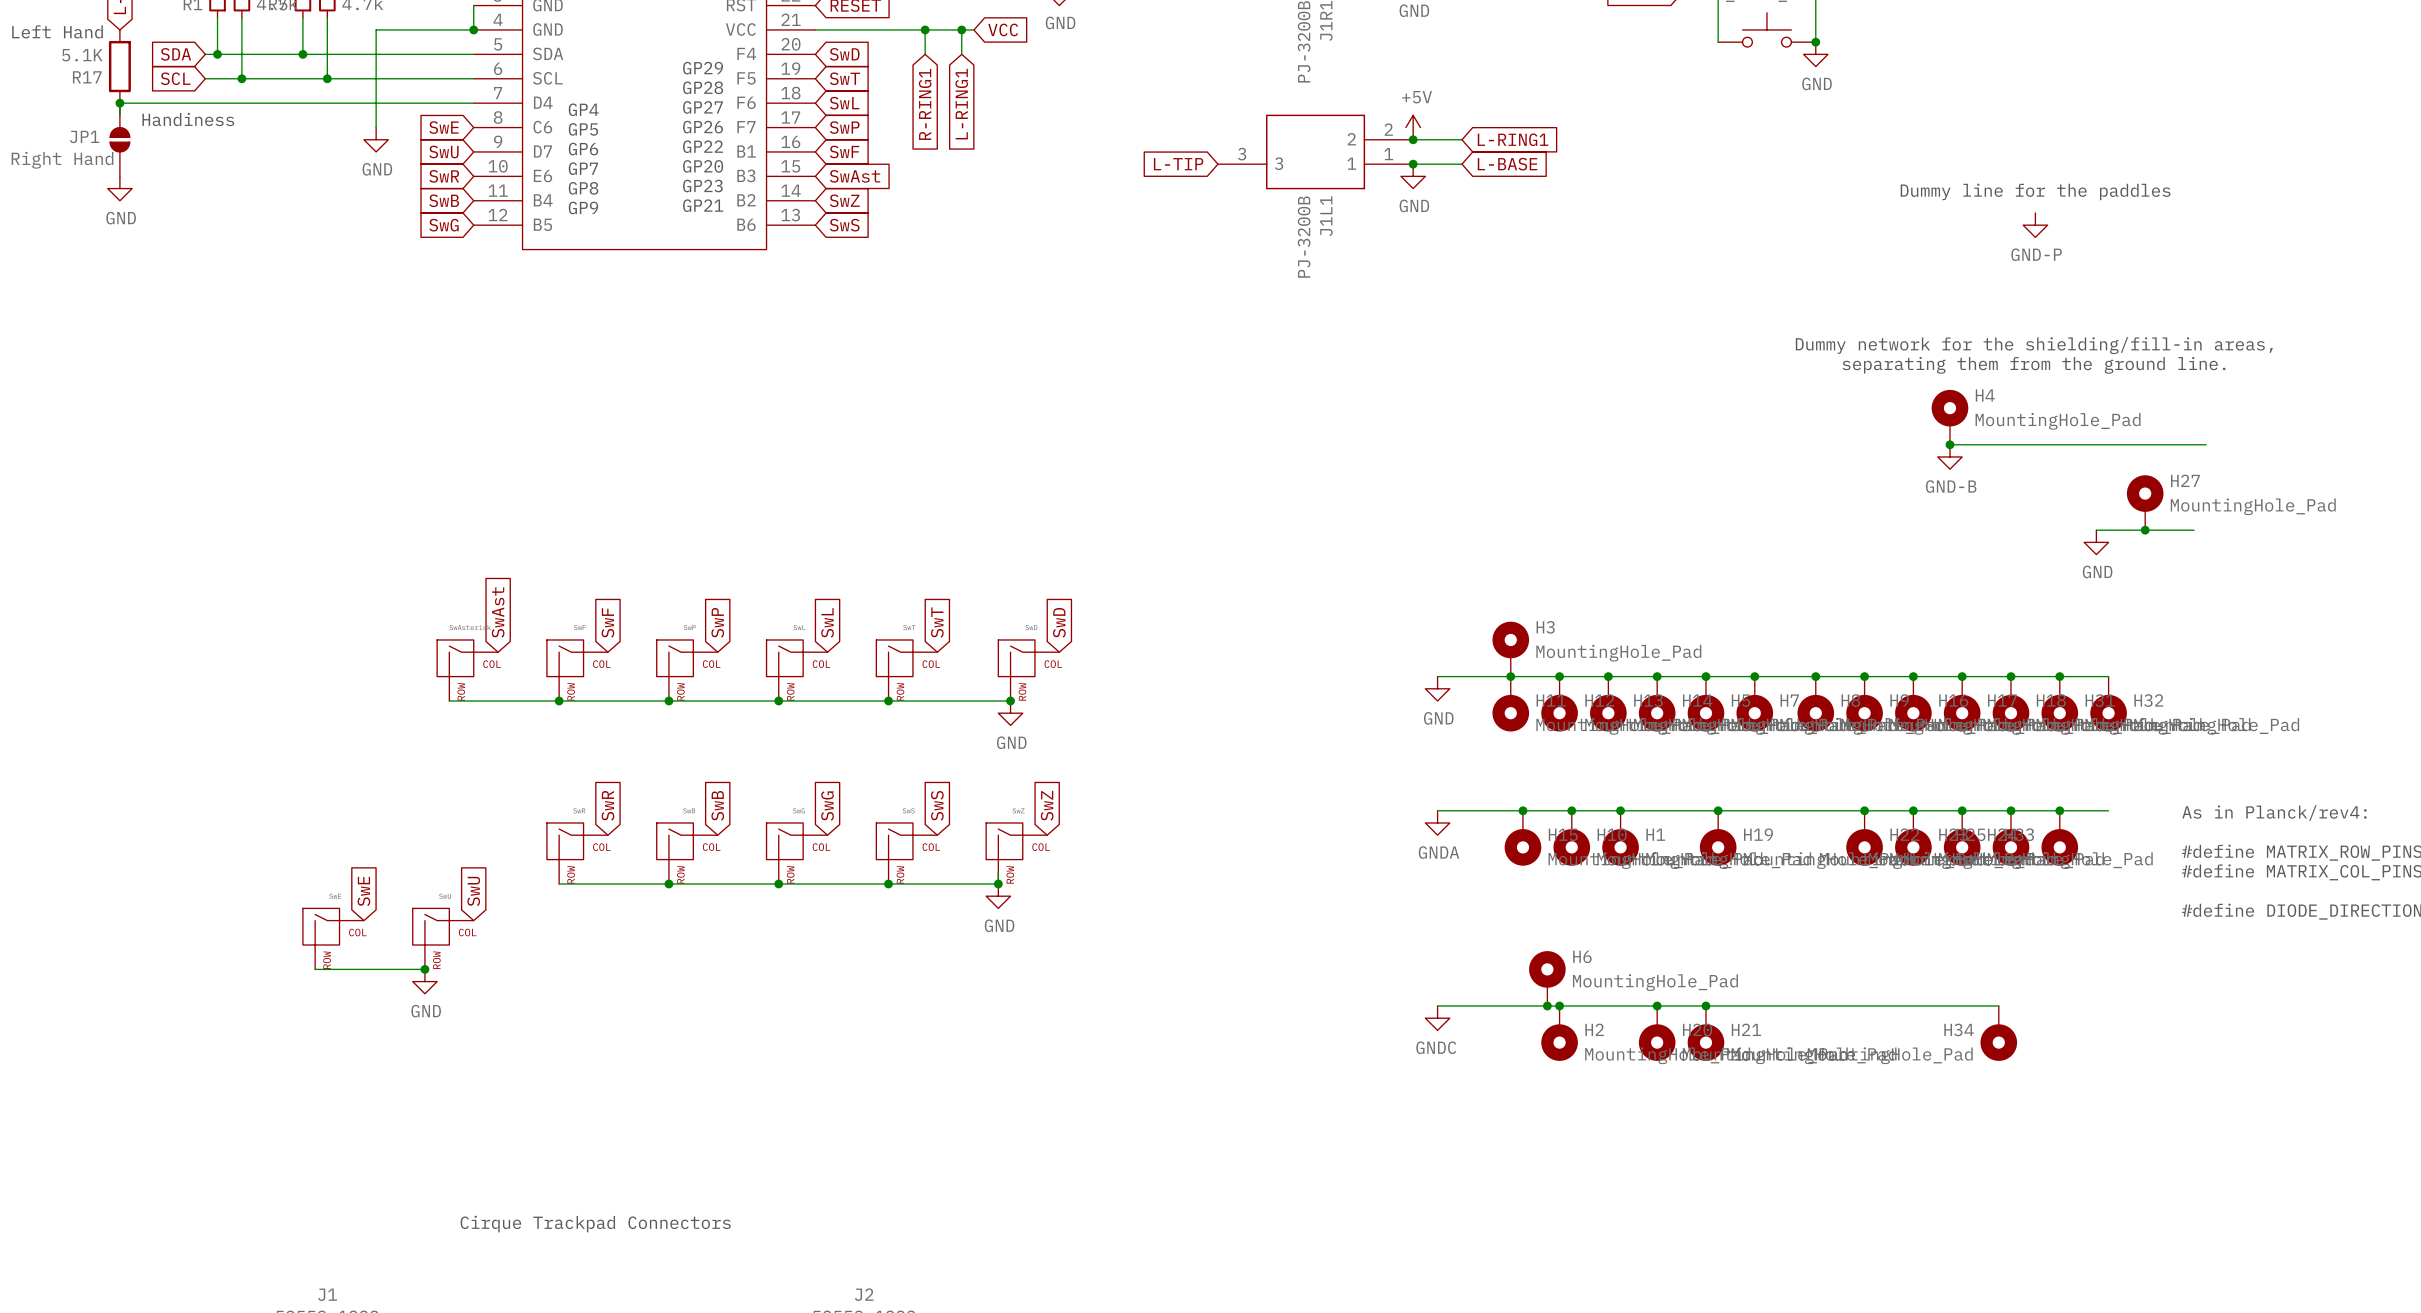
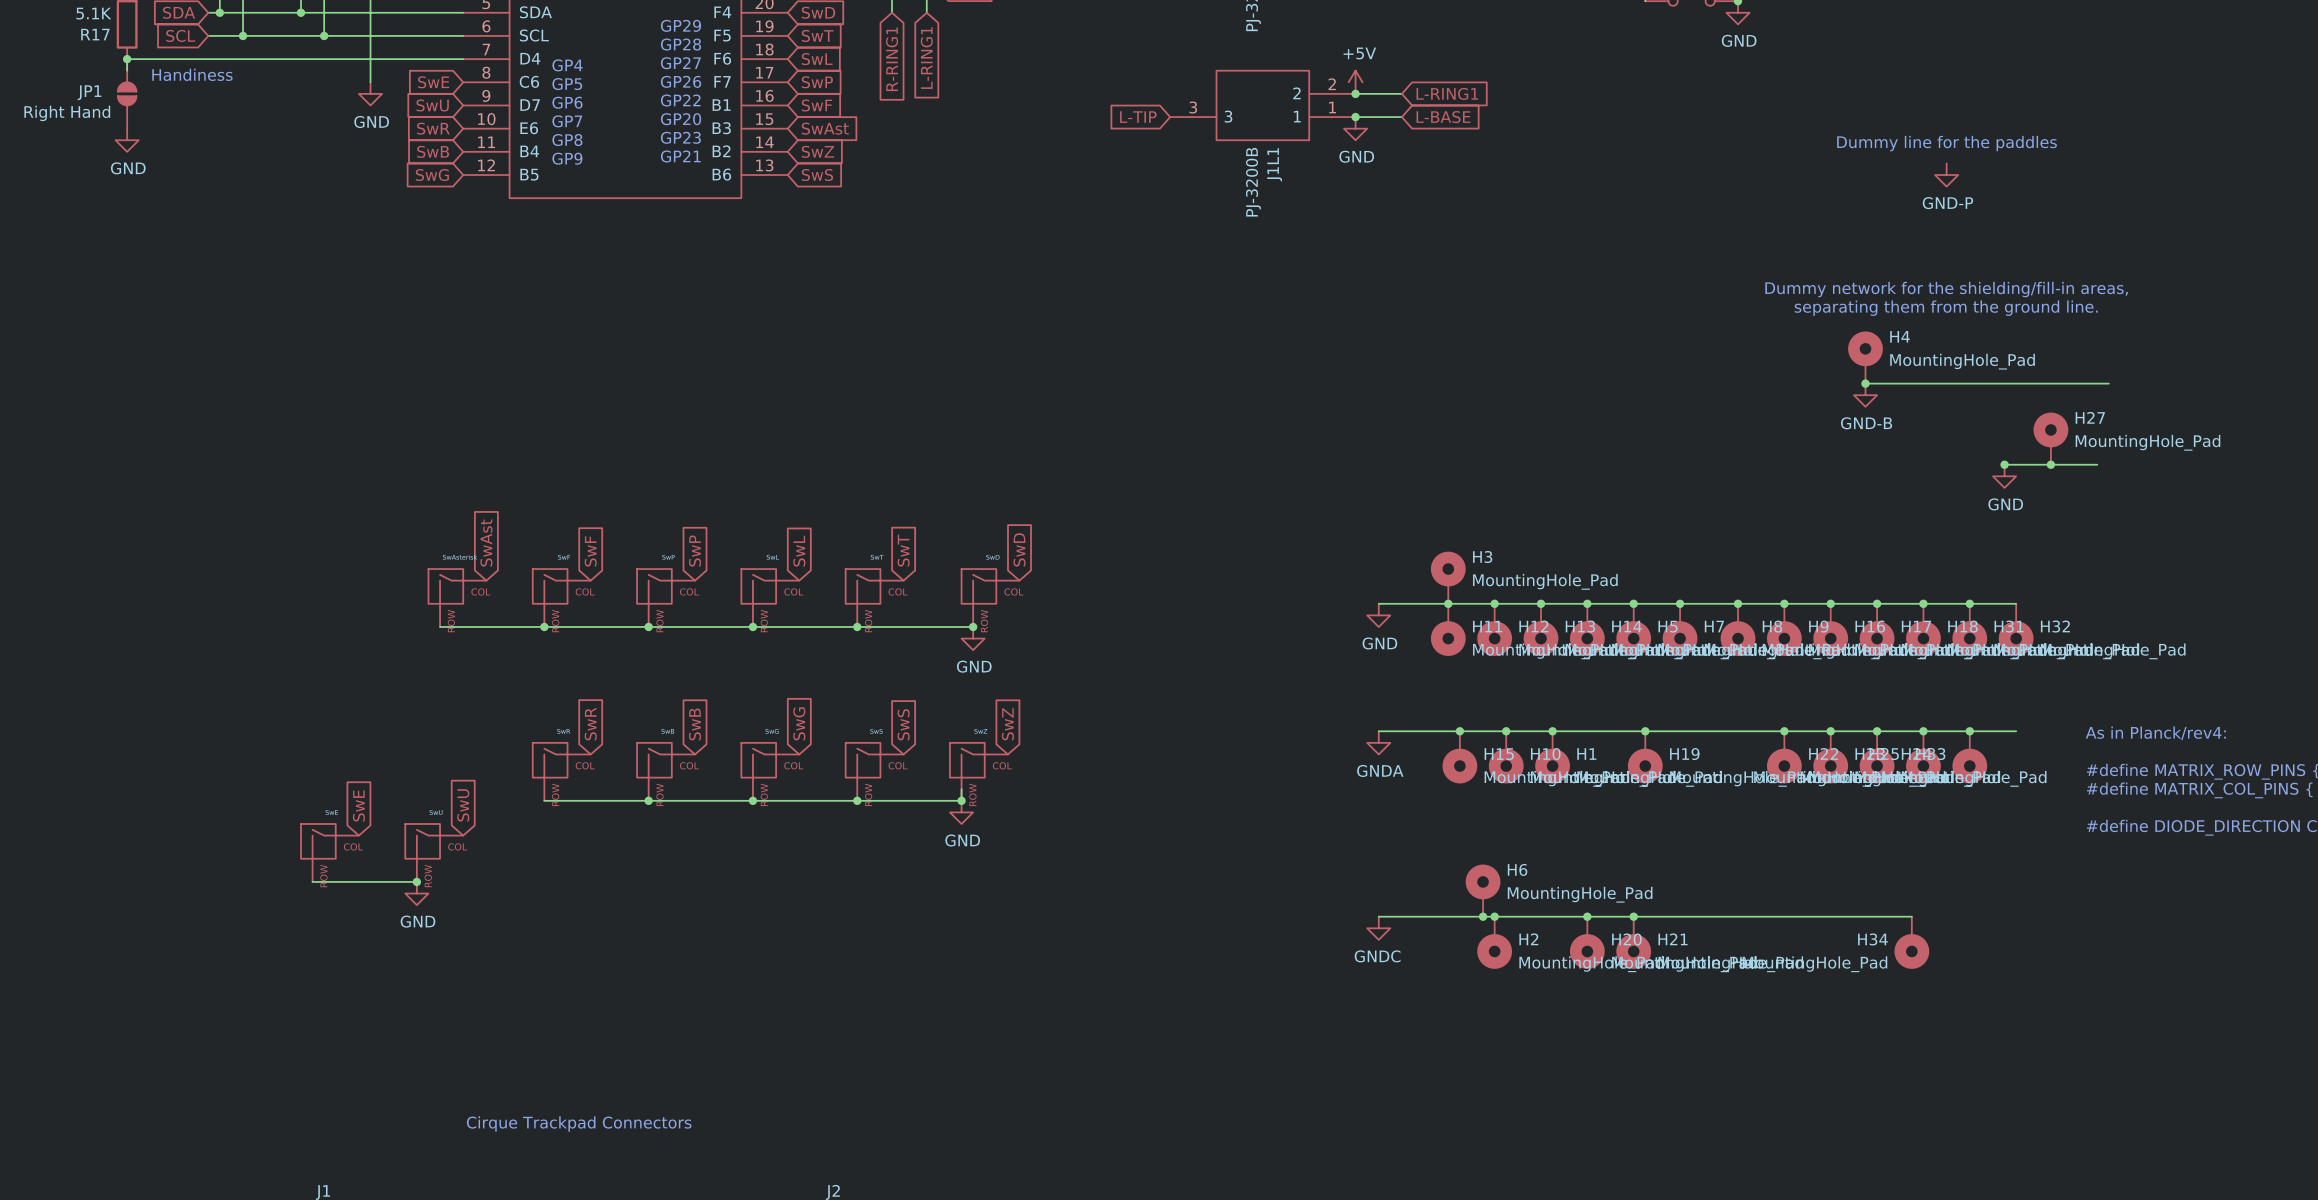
junction: none -> (2004, 464)

